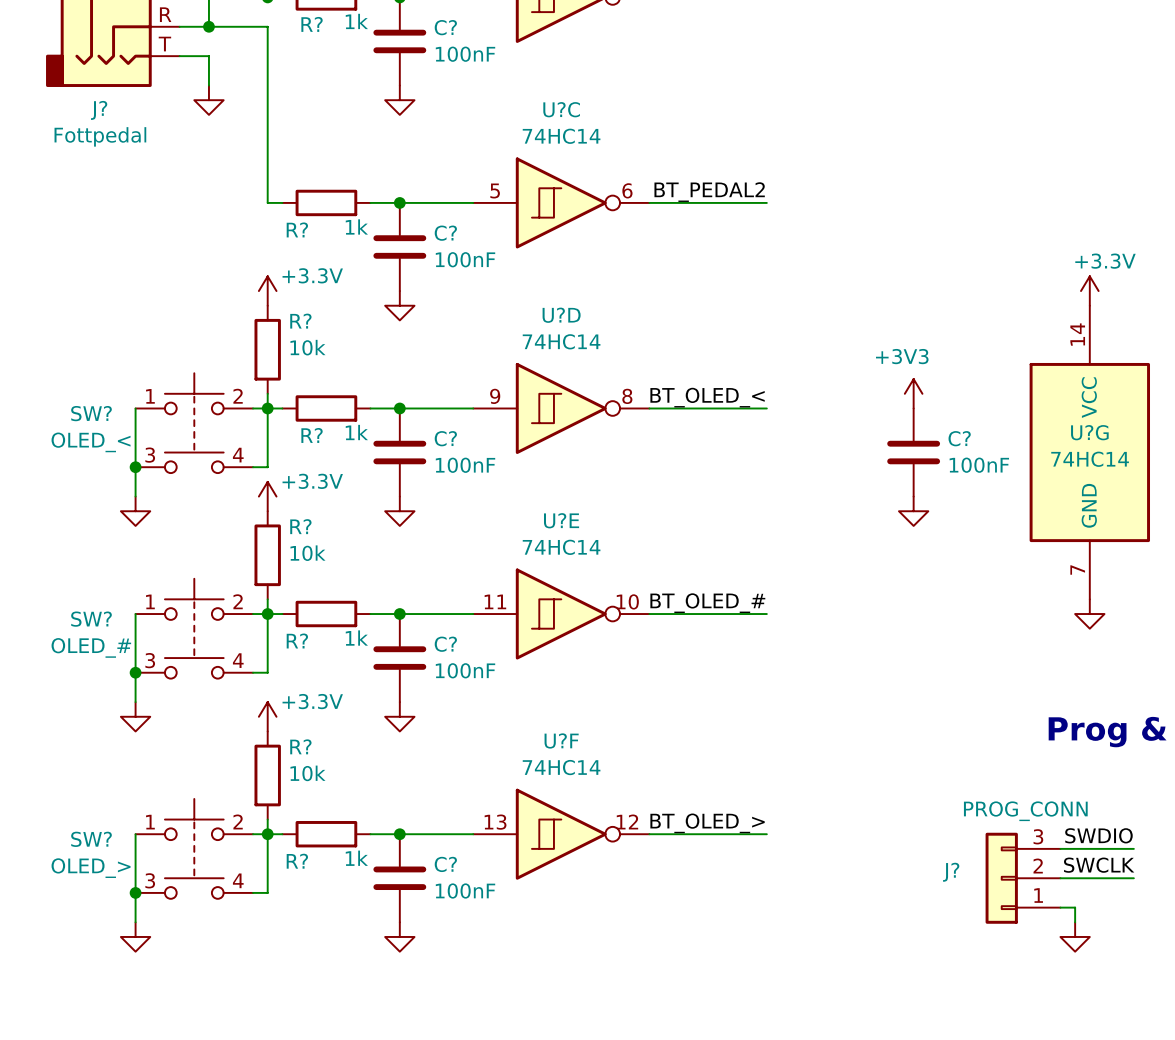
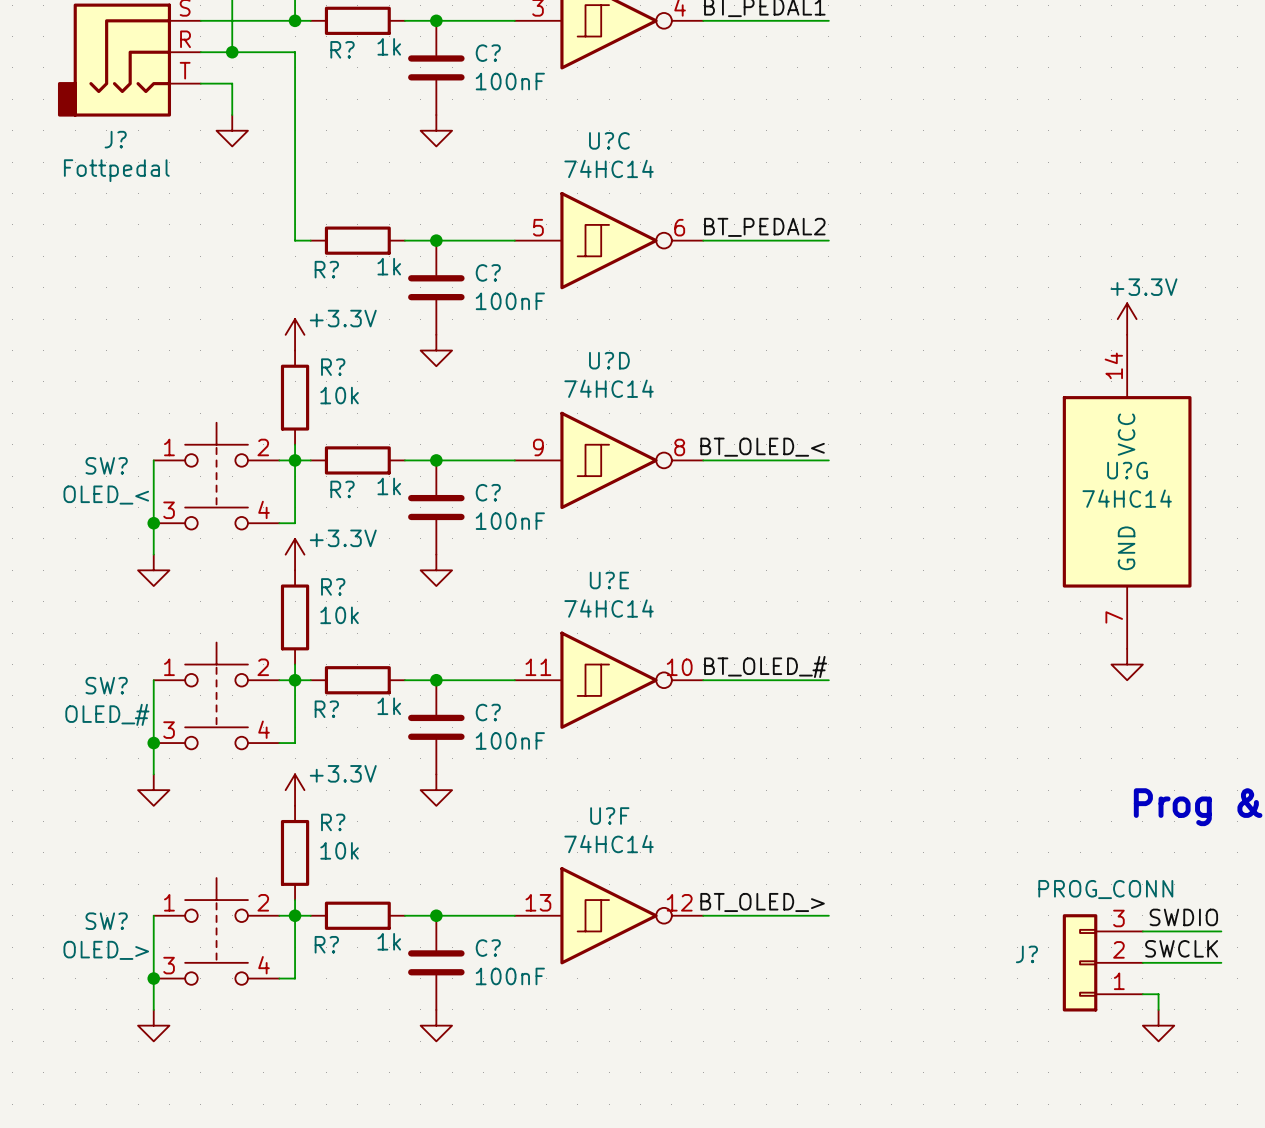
power symbol position: +3.3V (1089, 291) -> +3.3V (1127, 319)
power symbol: +3V3 (913, 393) -> none
C?: 100nF (913, 452) -> none
U?G position: (1089, 452) -> (1127, 491)
power symbol: (913, 511) -> none
power symbol position: (1089, 614) -> (1127, 664)

